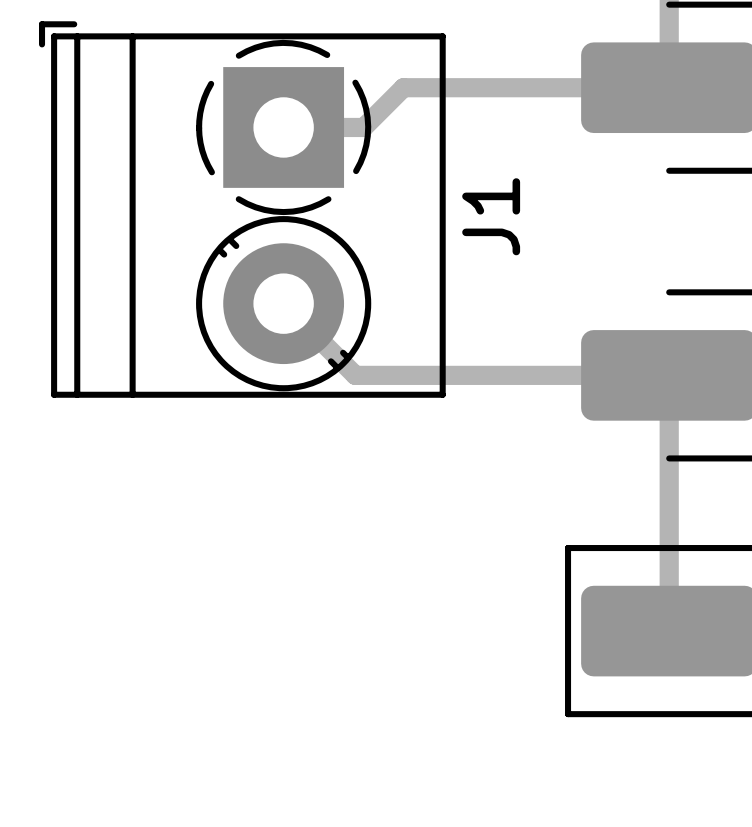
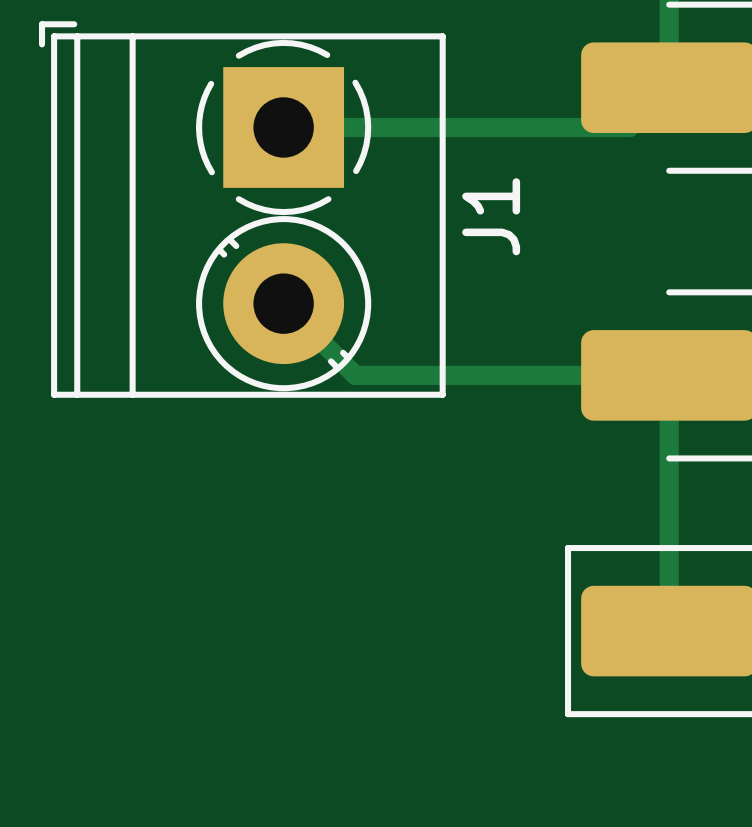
track: (669, 87) (403, 87) (363, 127) -> (669, 87) (629, 127) (363, 127)

